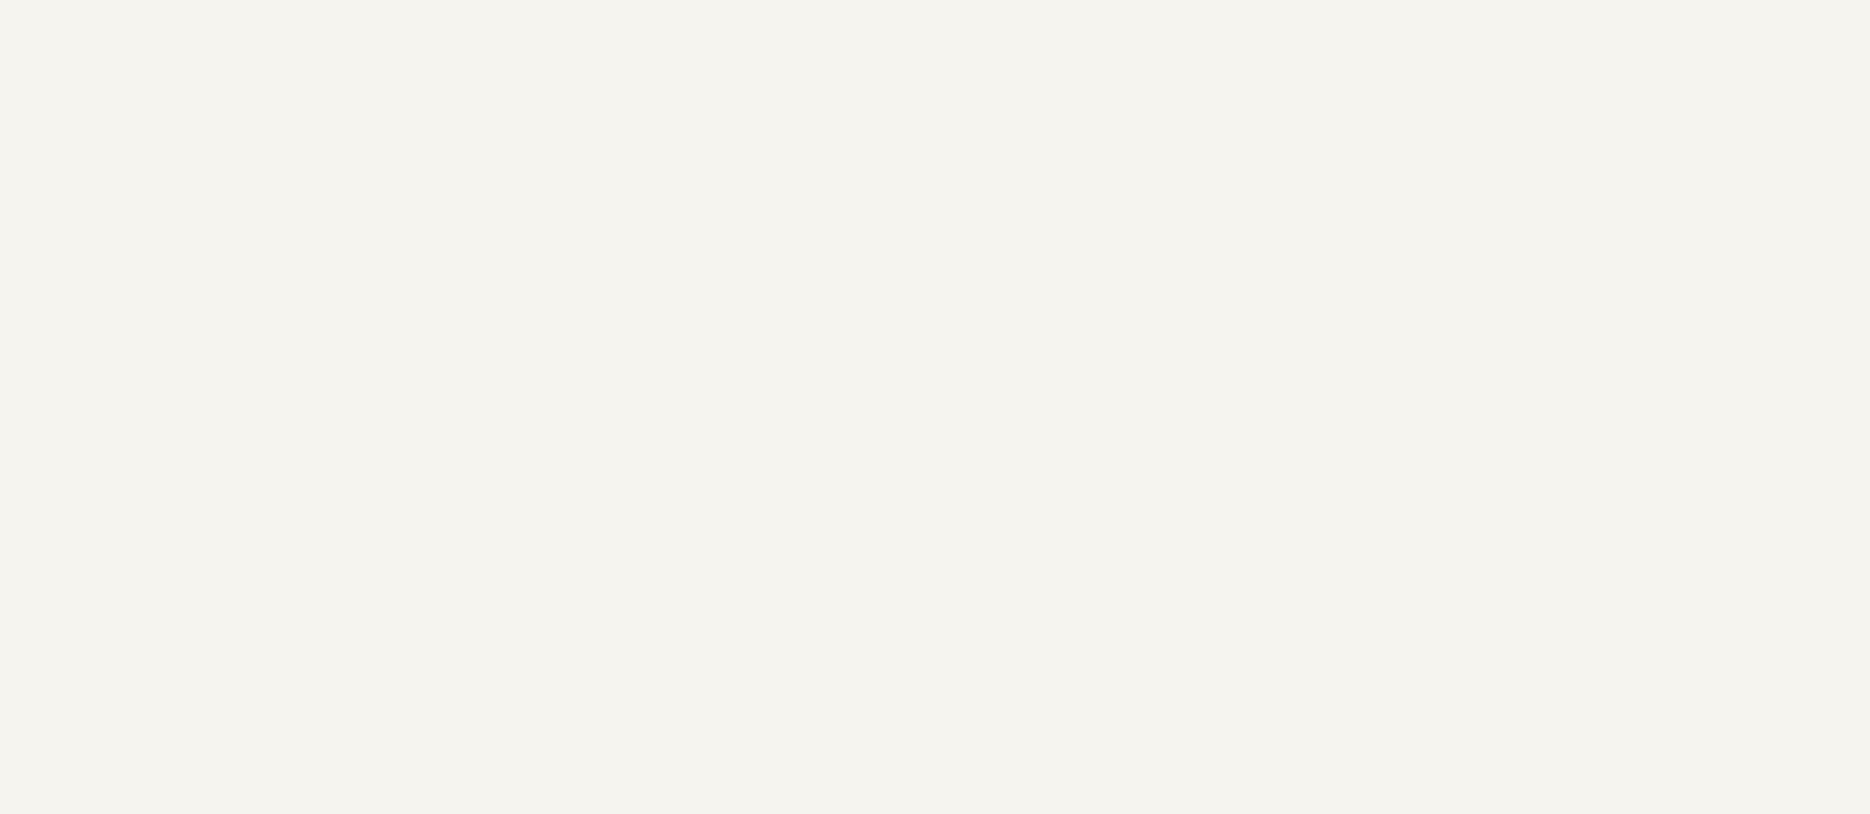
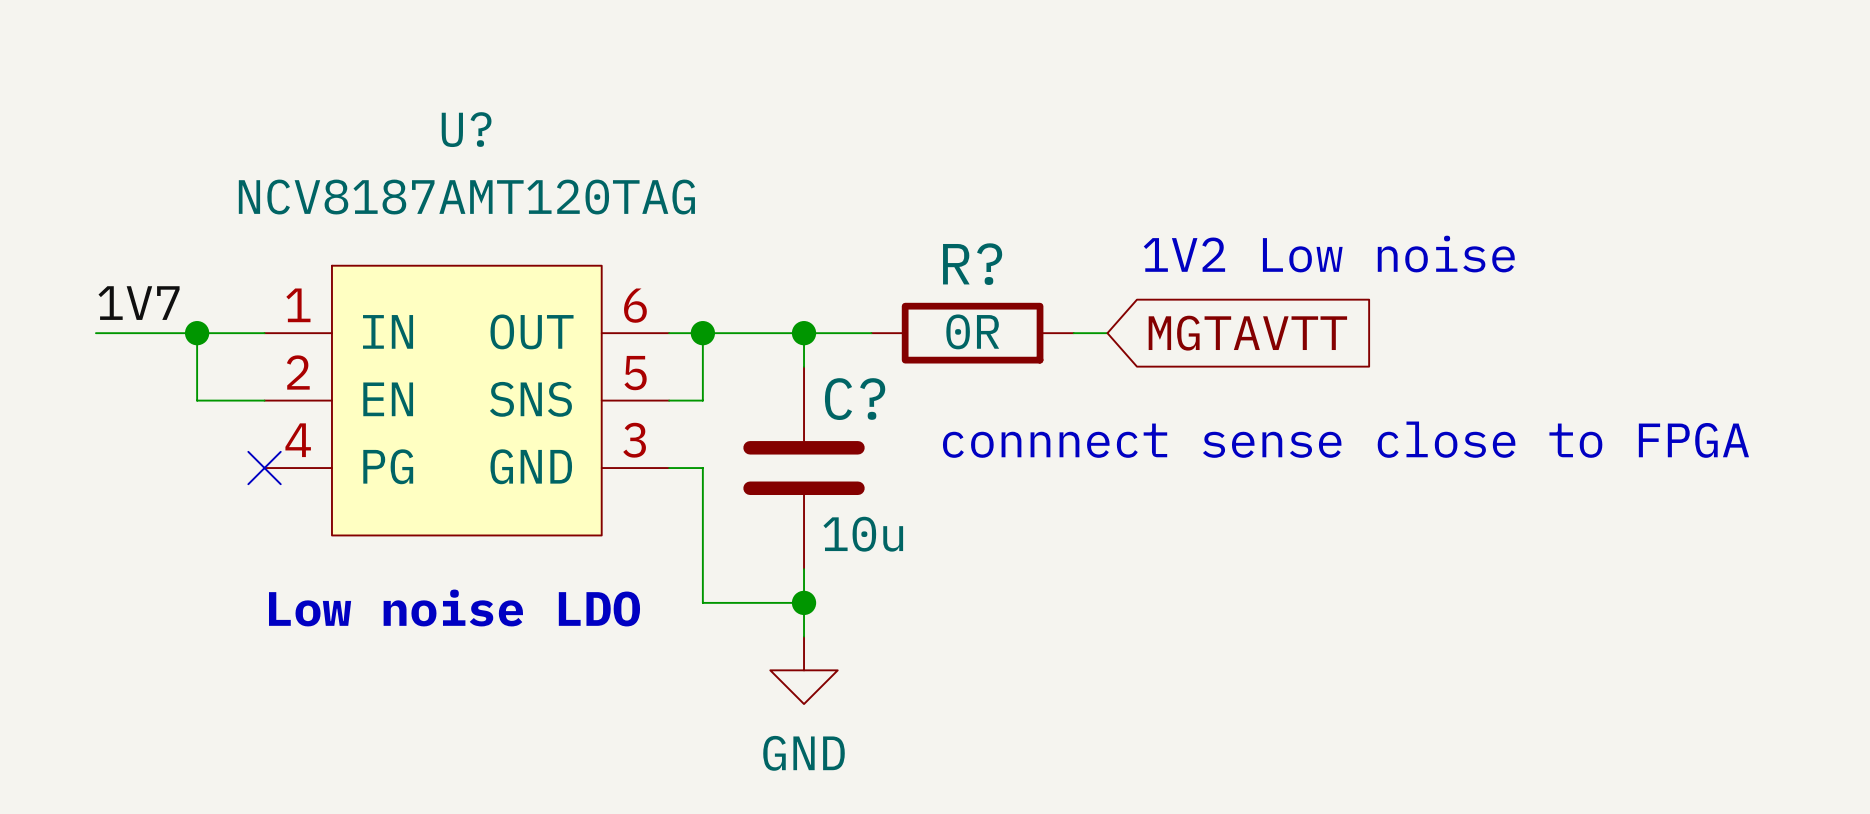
text: none -> 1V2 Low noise (1329, 254)
label: none -> 1V7 (139, 303)
wire: none -> (95, 333) (264, 333)
wire: none -> (197, 333) (197, 400) (264, 400)
junction: none -> (197, 333)
wire: none -> (669, 333) (871, 333)
wire: none -> (702, 333) (702, 400) (669, 400)
junction: none -> (702, 333)
wire: none -> (804, 333) (804, 366)
junction: none -> (804, 333)
R?: none -> (972, 333)
wire: none -> (1073, 333) (1107, 333)
global label: none -> MGTAVTT (1247, 333)
U?: none -> NCV8187AMT120TAG (466, 400)
text: none -> connnect sense close to FPGA (1345, 439)
no-connect mark: none -> (264, 468)
wire: none -> (669, 468) (702, 468) (702, 602) (804, 602)
C?: none -> (804, 468)
wire: none -> (804, 569) (804, 636)
junction: none -> (804, 602)
text: none -> Low noise LDO (454, 608)
power symbol: none -> GND (804, 670)

